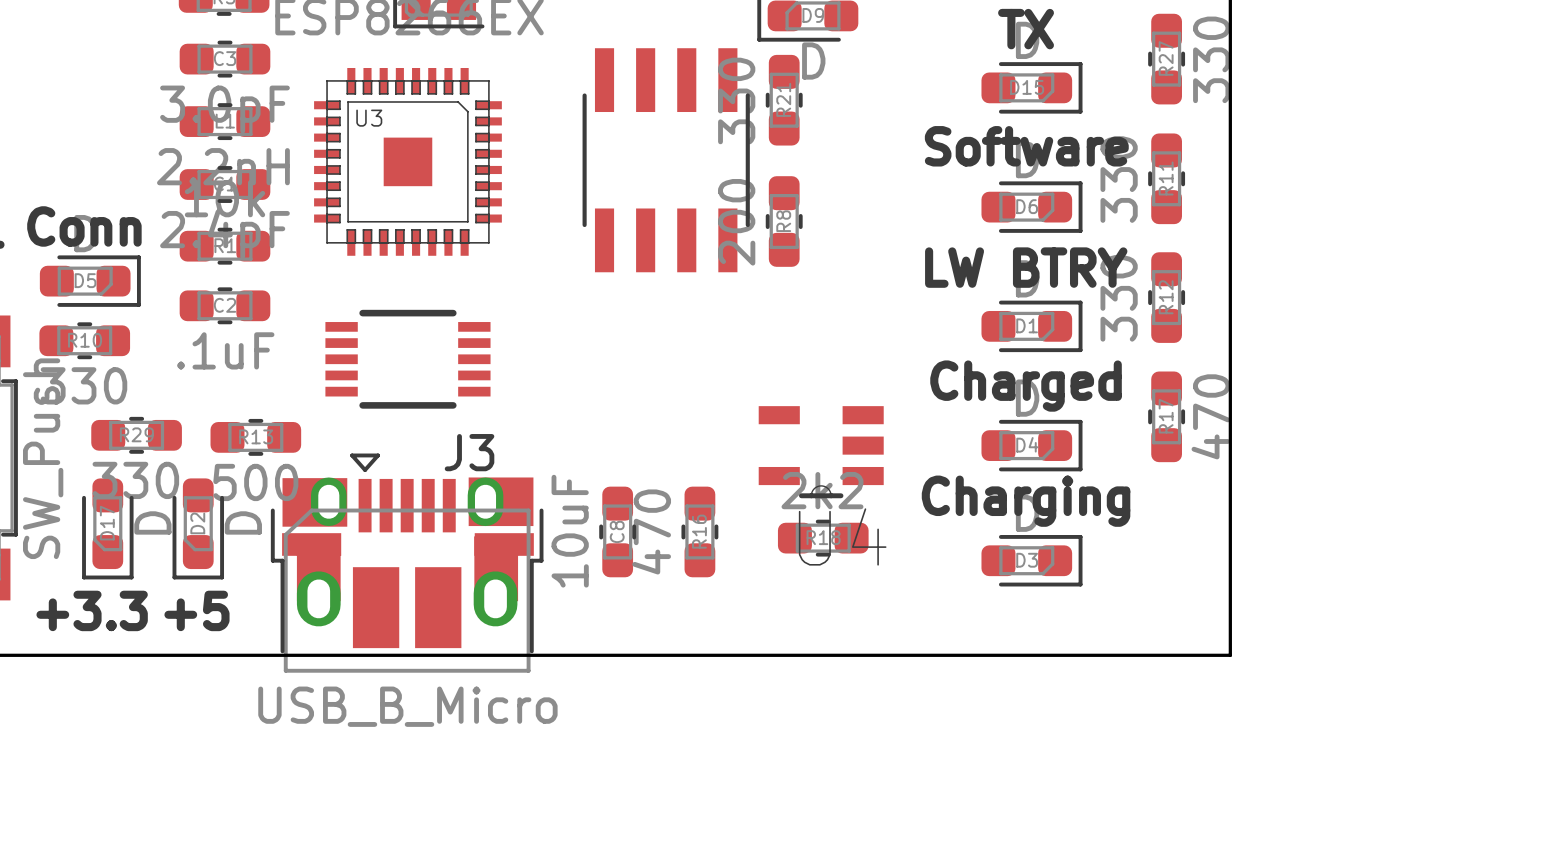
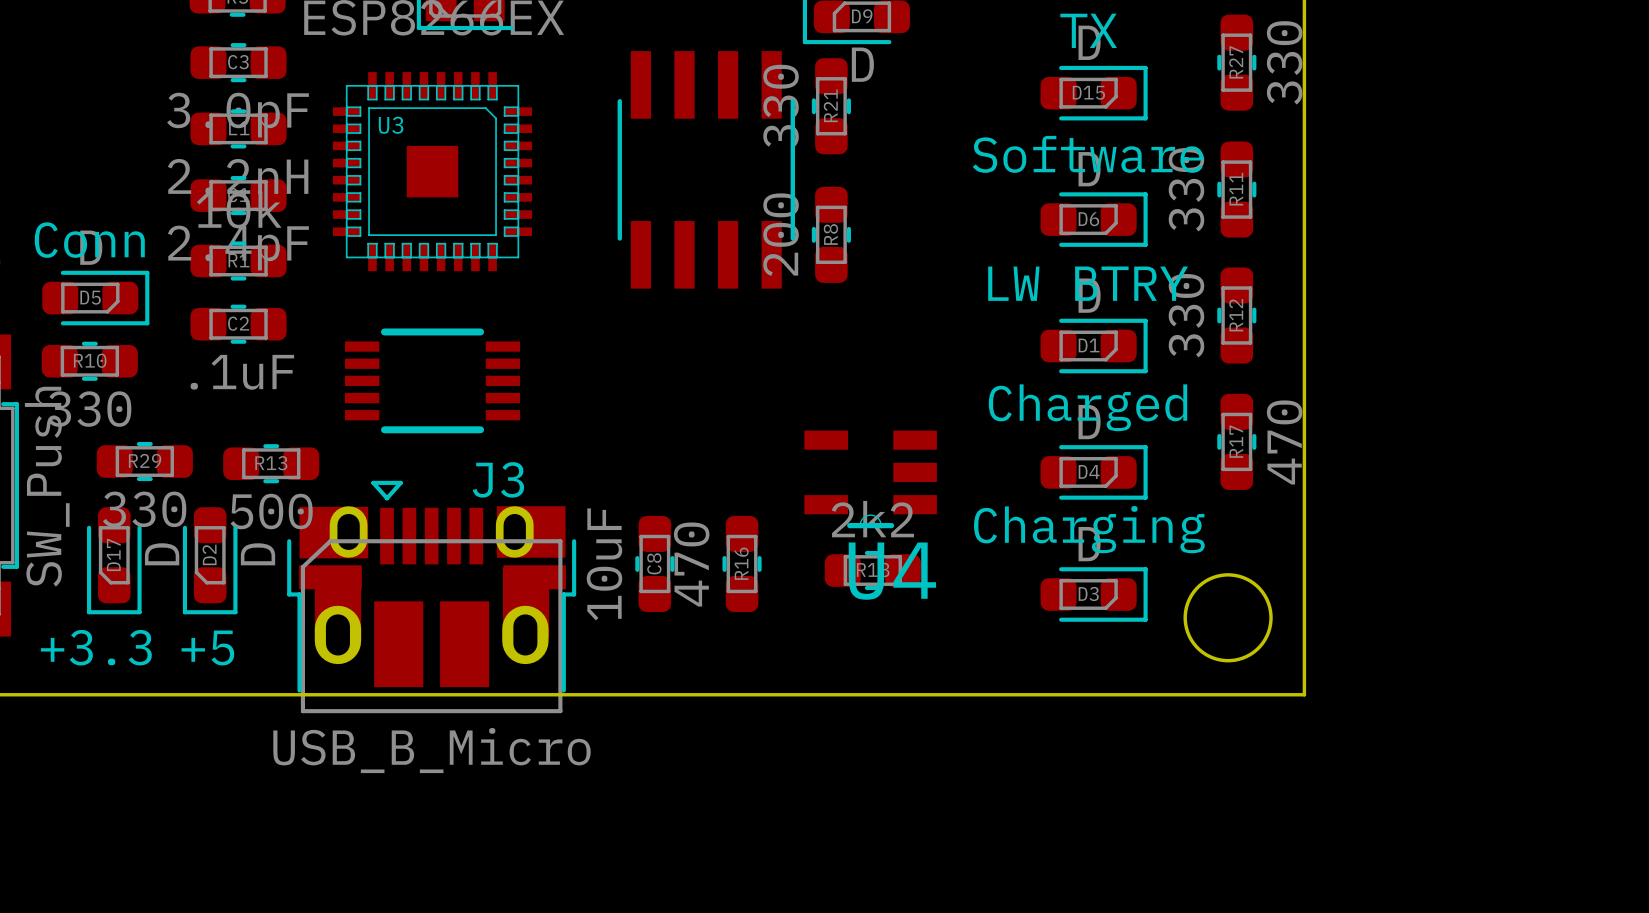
round board edge: none -> [1183, 573, 1273, 663]

